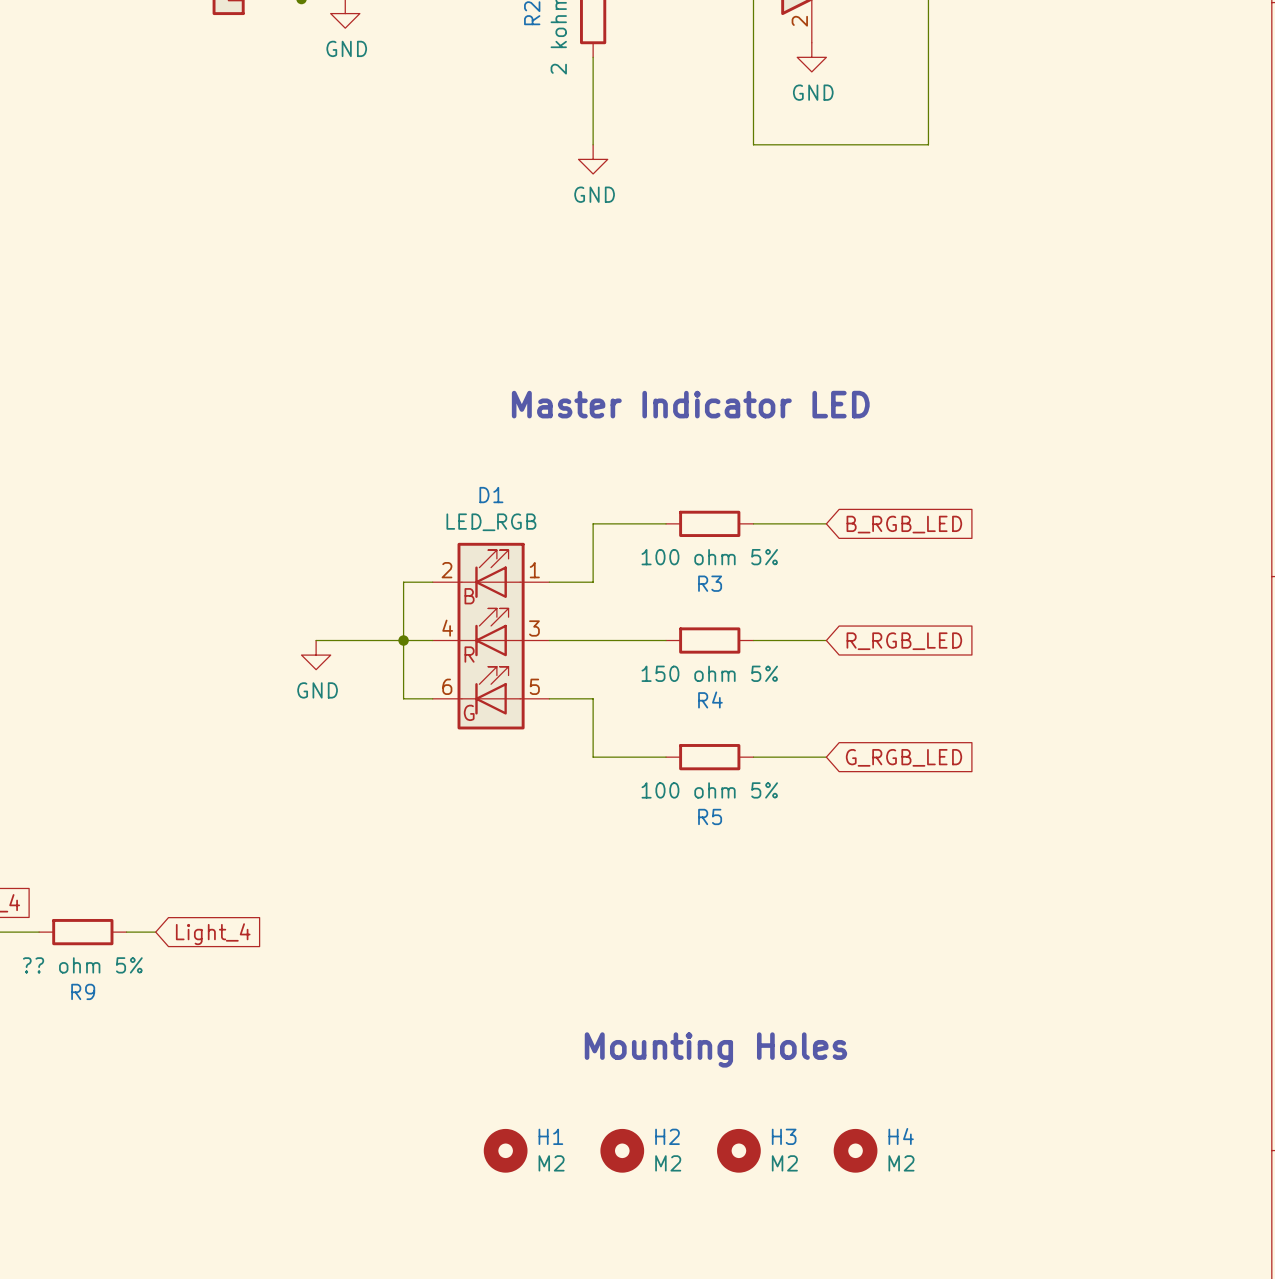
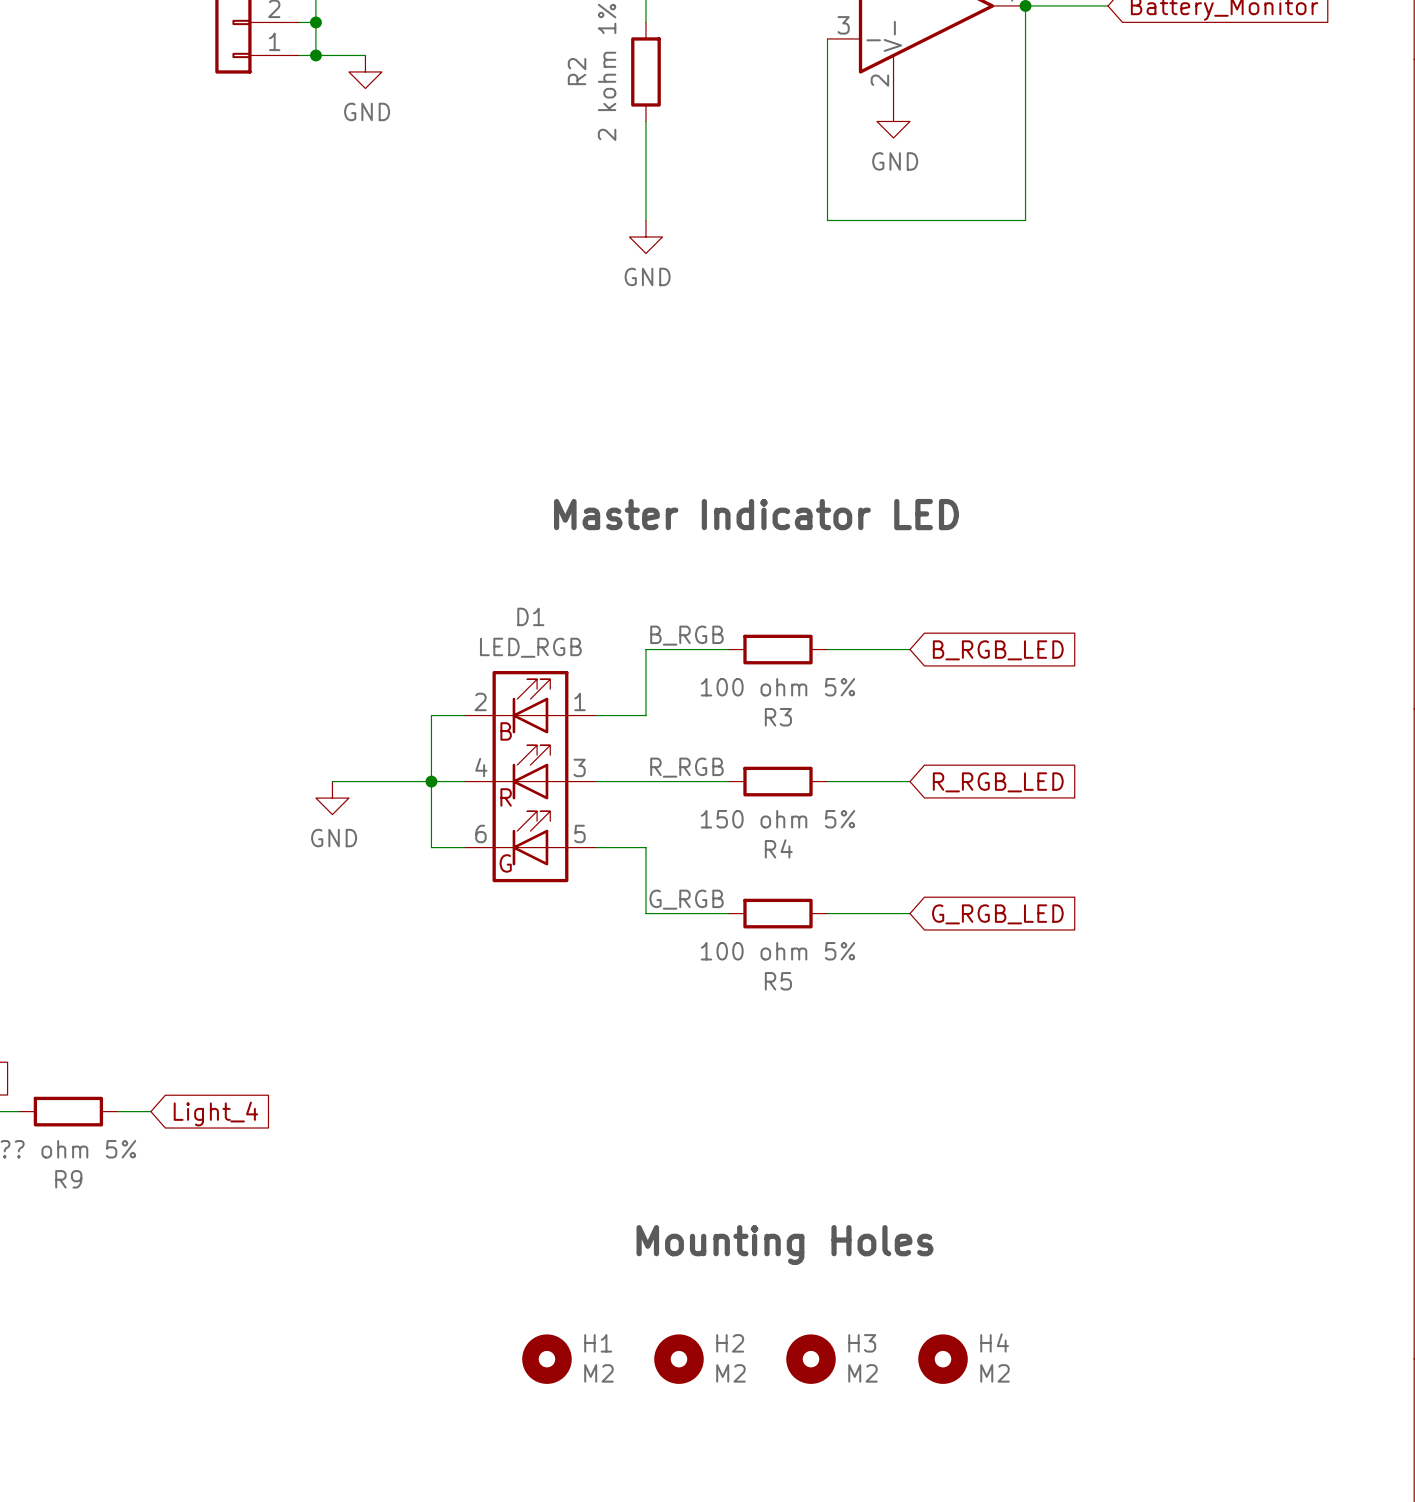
label: none -> B_RGB (686, 635)
label: none -> R_RGB (686, 767)
label: none -> G_RGB (686, 899)

